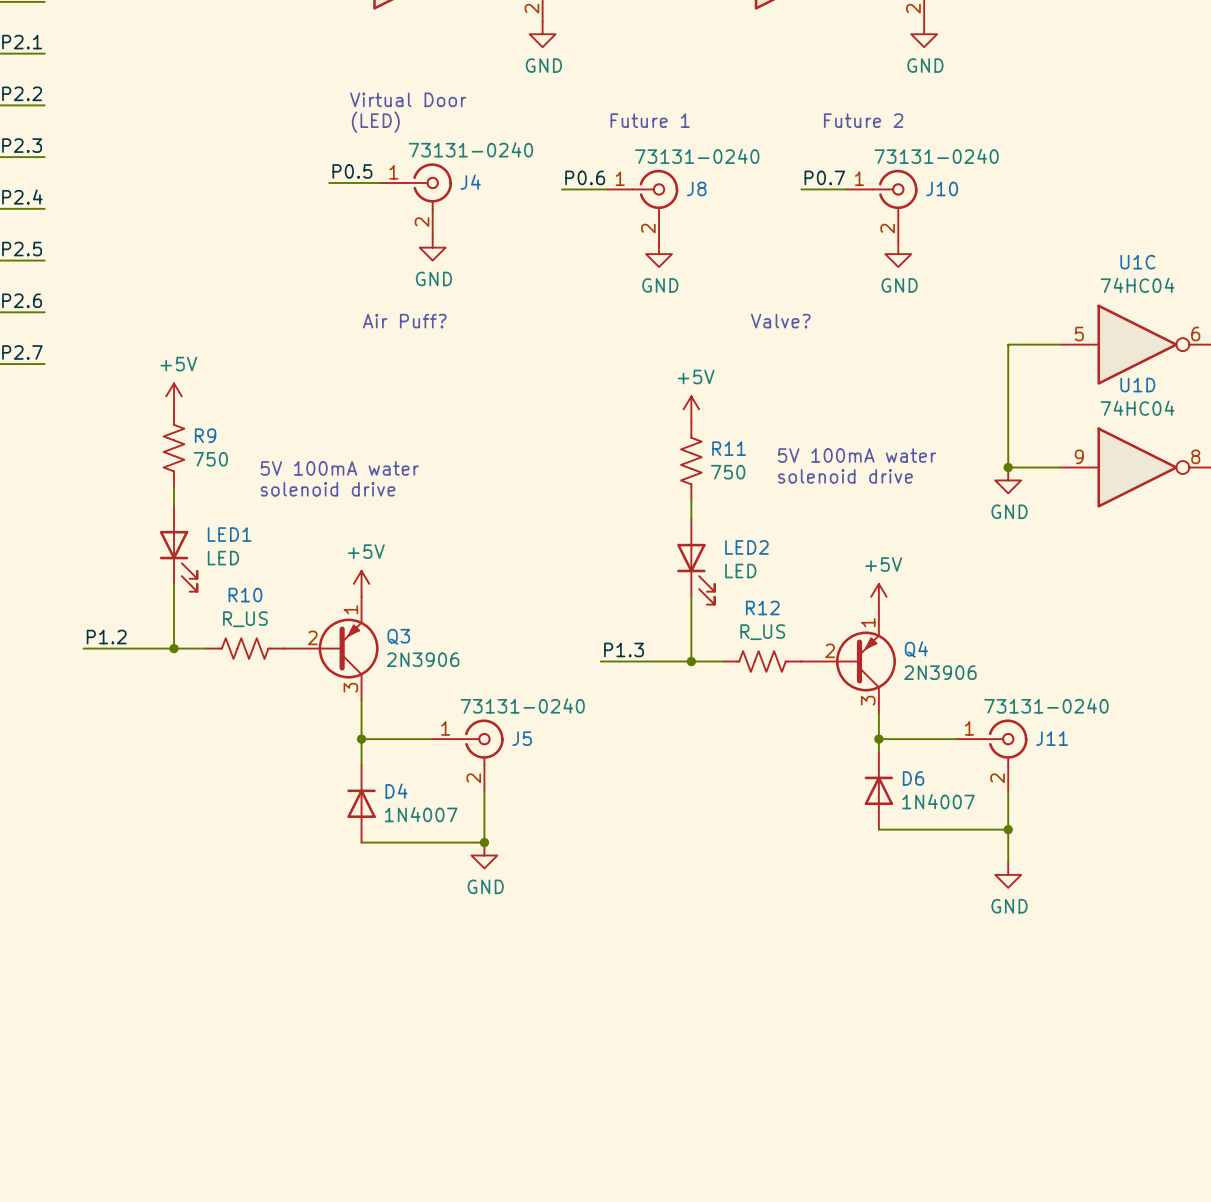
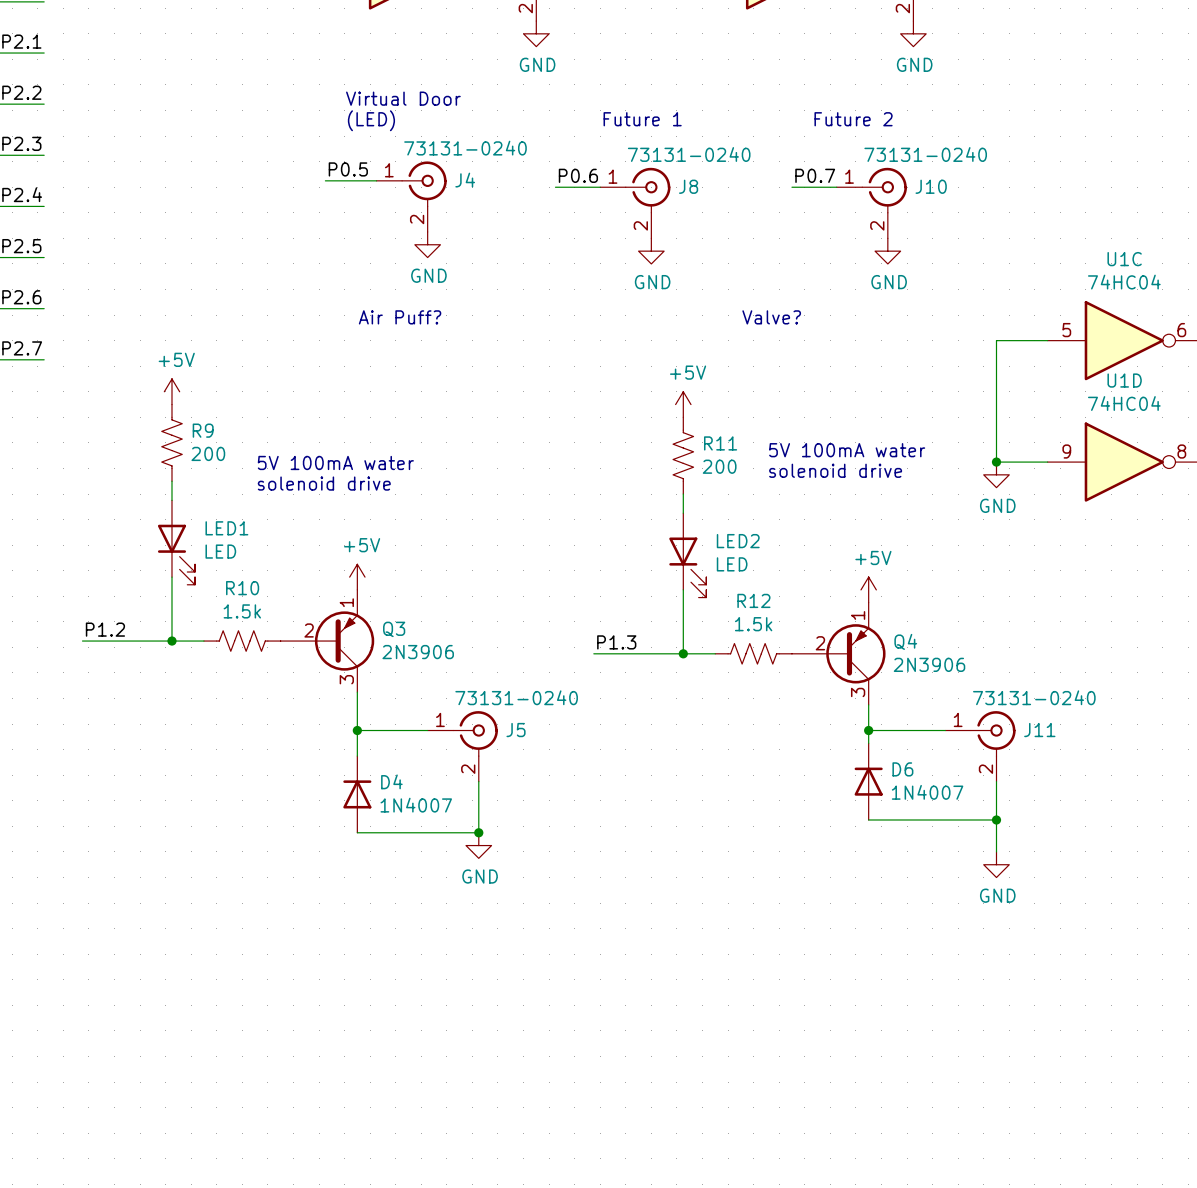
R9 value: 750 (210, 459) -> 200 (208, 453)
R11 value: 750 (728, 472) -> 200 (719, 466)
R10 value: R_US (245, 619) -> 1.5k (242, 611)
R12 value: R_US (762, 632) -> 1.5k (753, 624)

